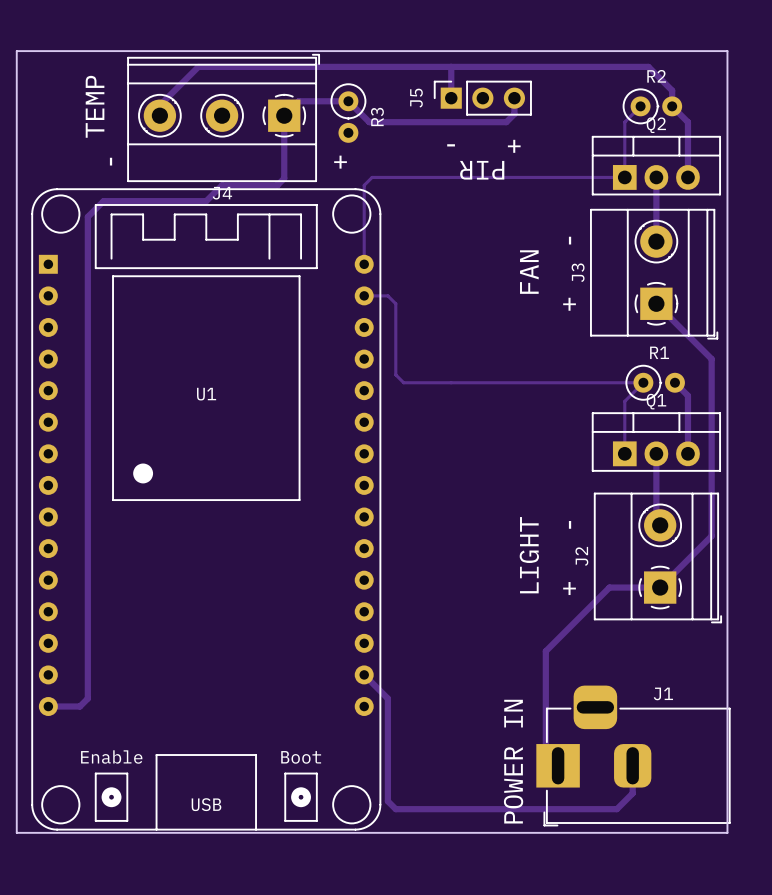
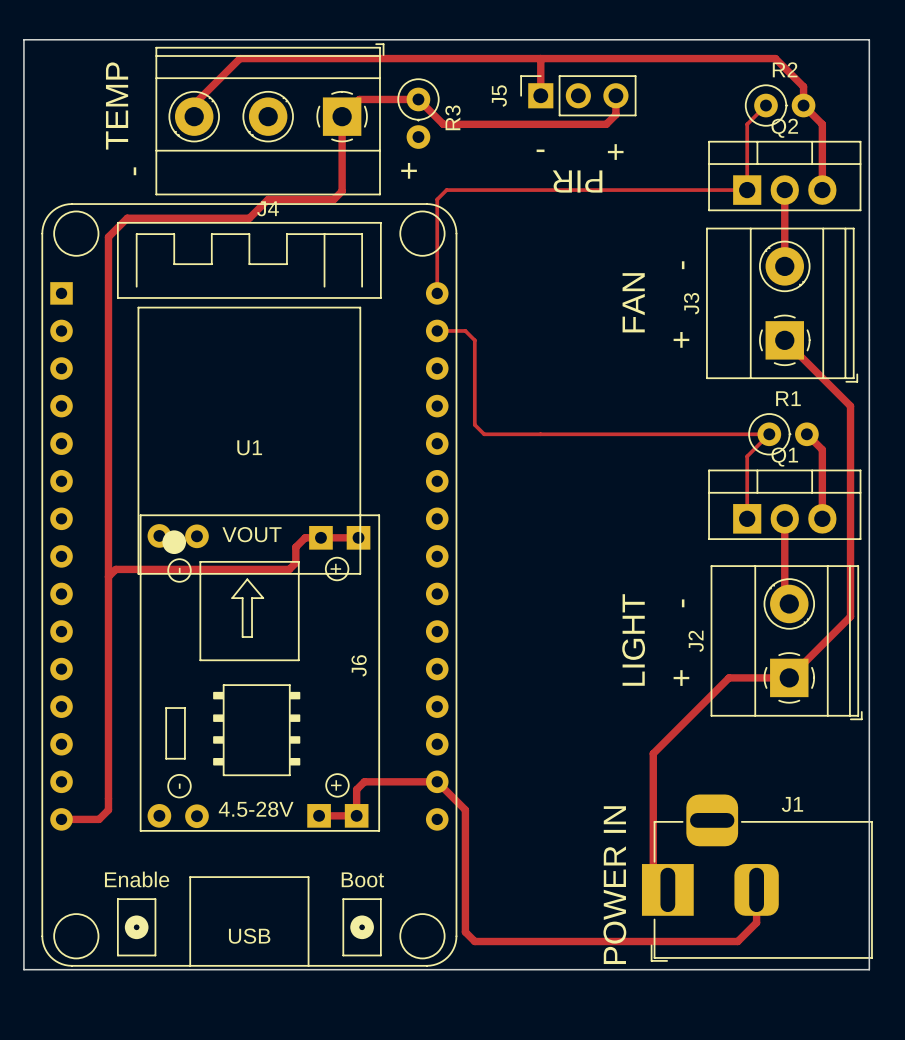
track: none -> (358, 537) (305, 537) (295, 547) (295, 562) (289, 569) (115, 569) (108, 576)
J6: none -> (259, 673)
track: none -> (437, 781) (364, 781) (356, 789) (356, 815) (319, 815)

